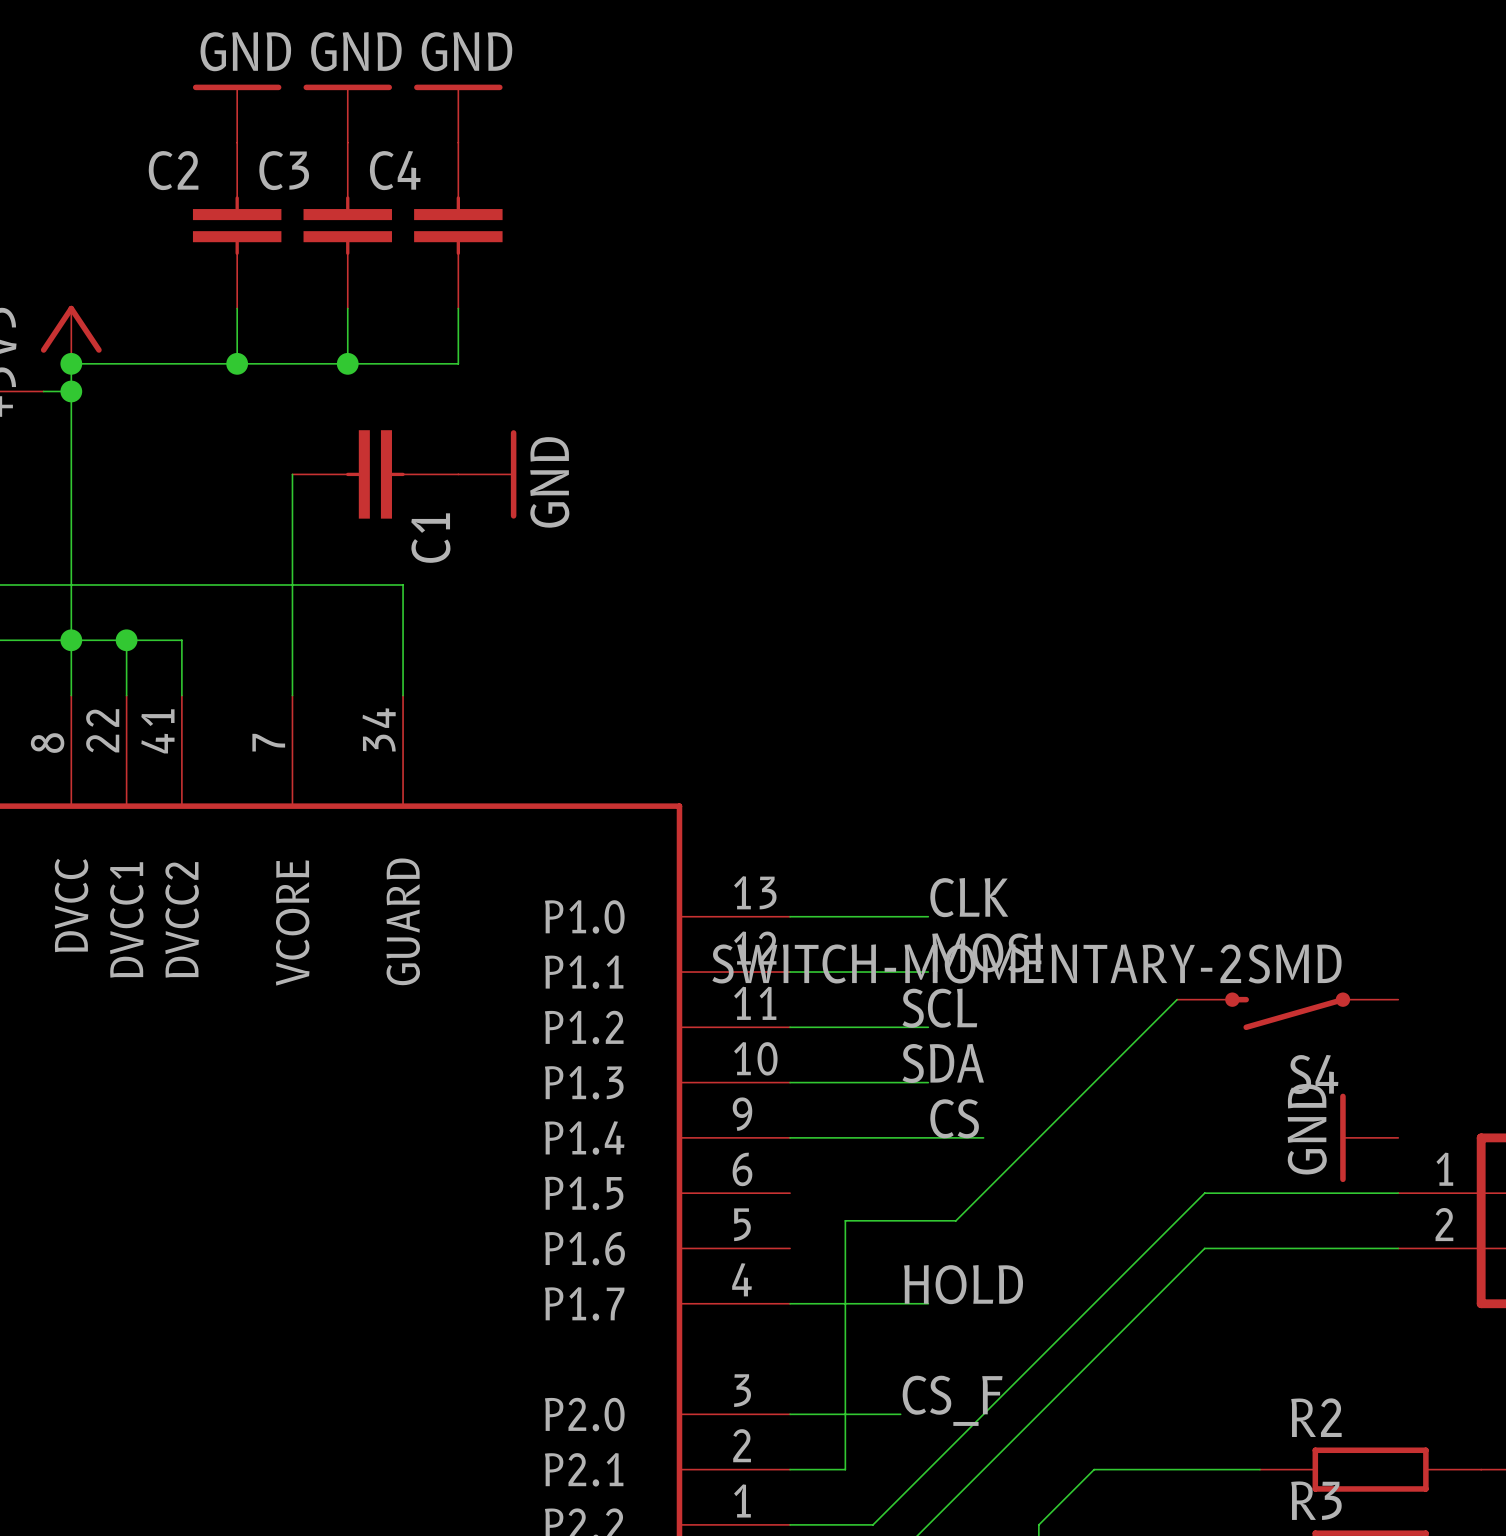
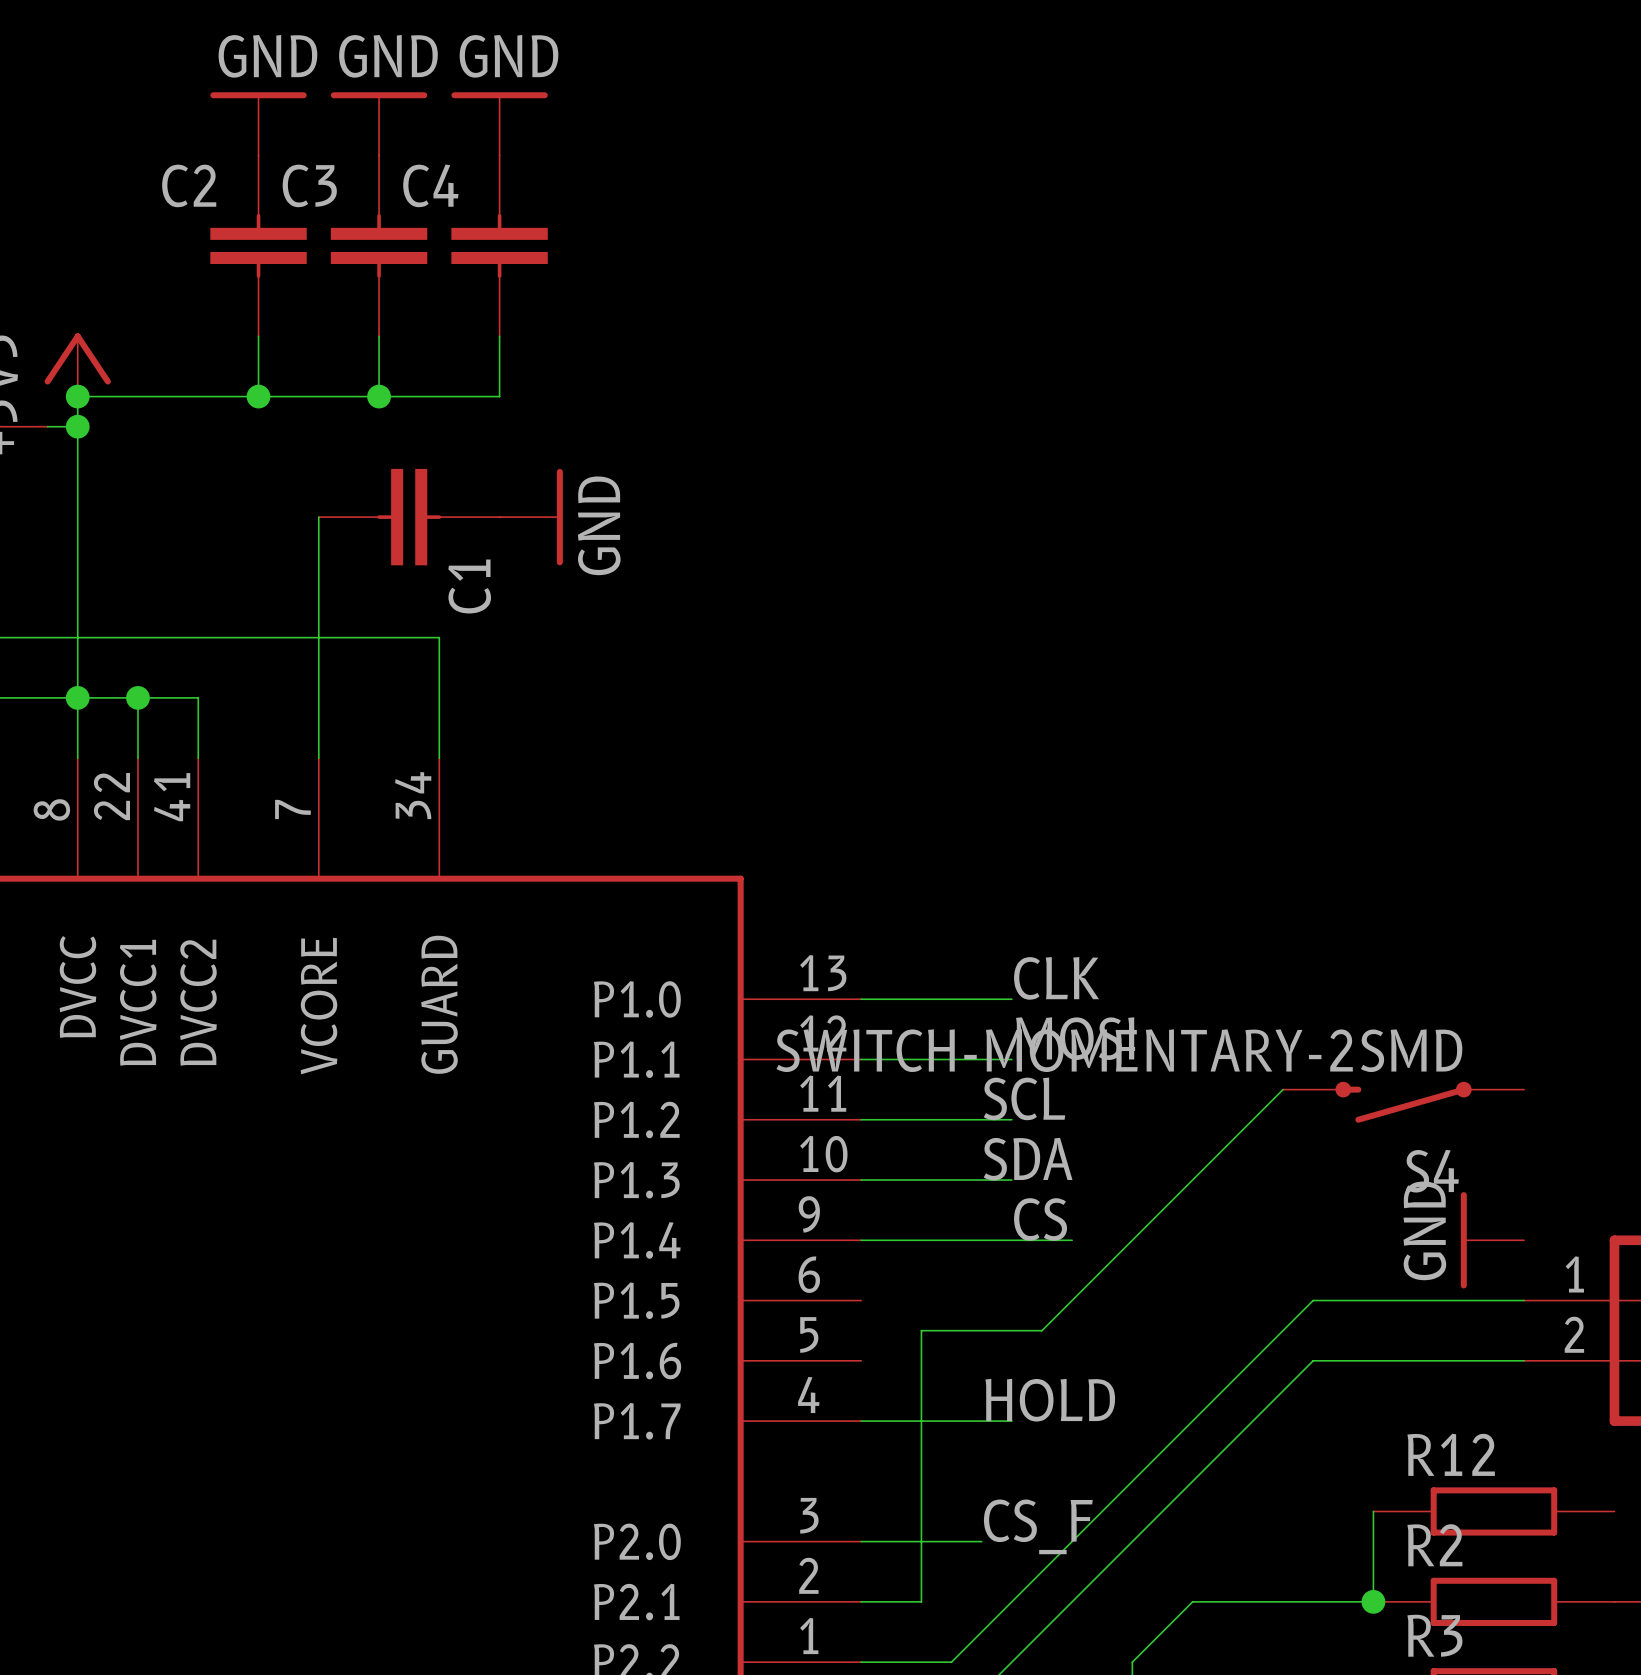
wire: none -> (1373, 1511) (1373, 1601)
R12: none -> (1493, 1511)
junction: none -> (1373, 1601)

